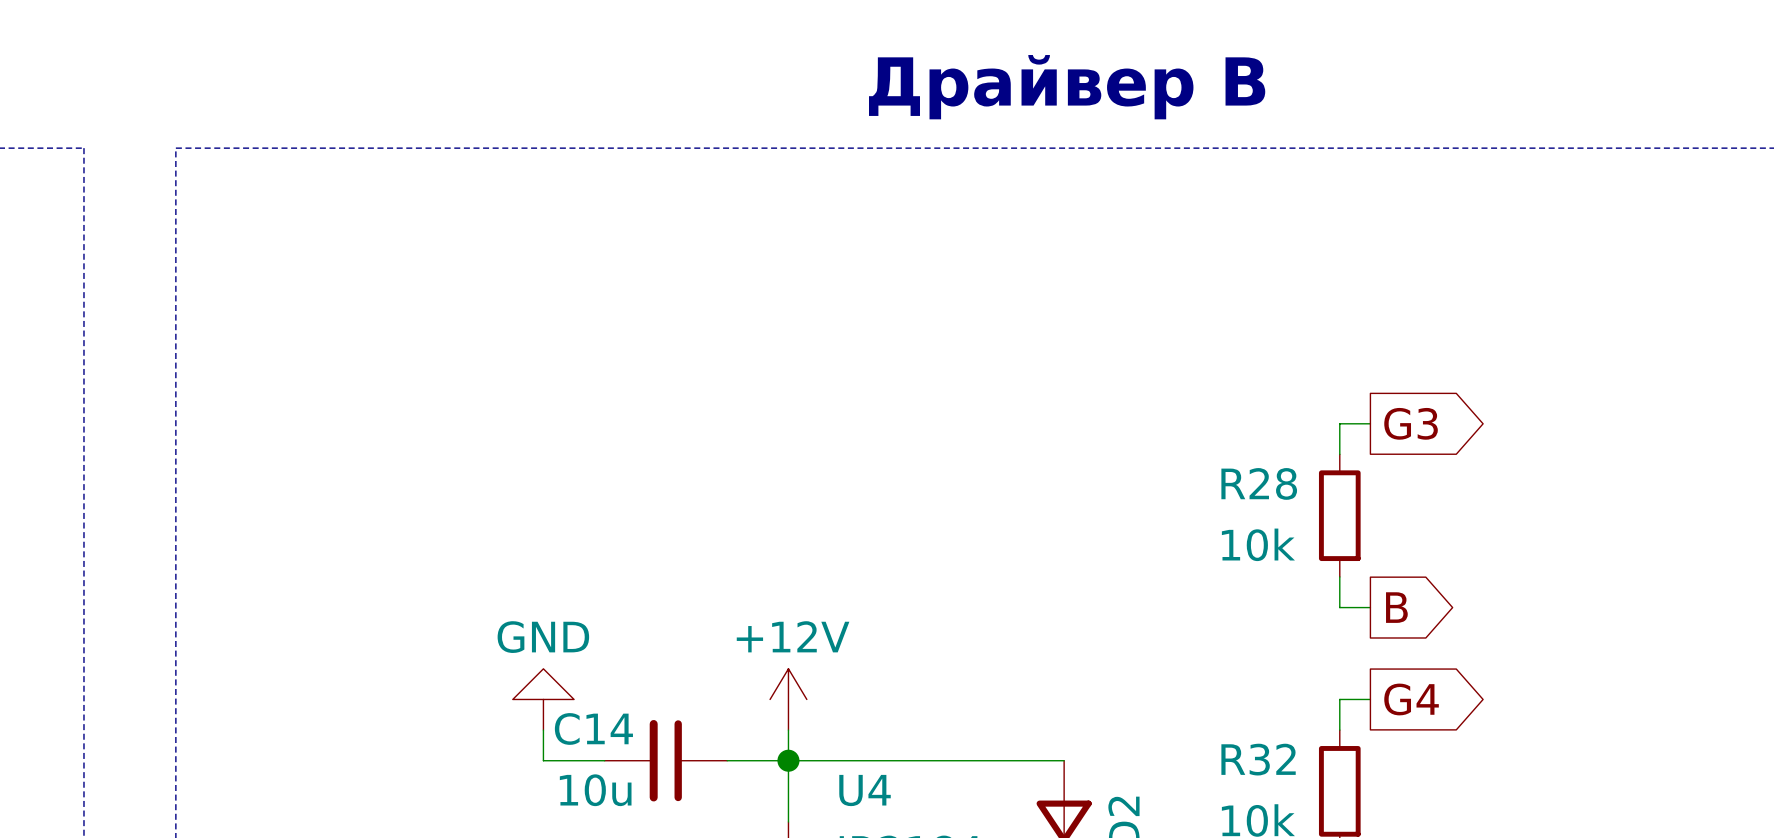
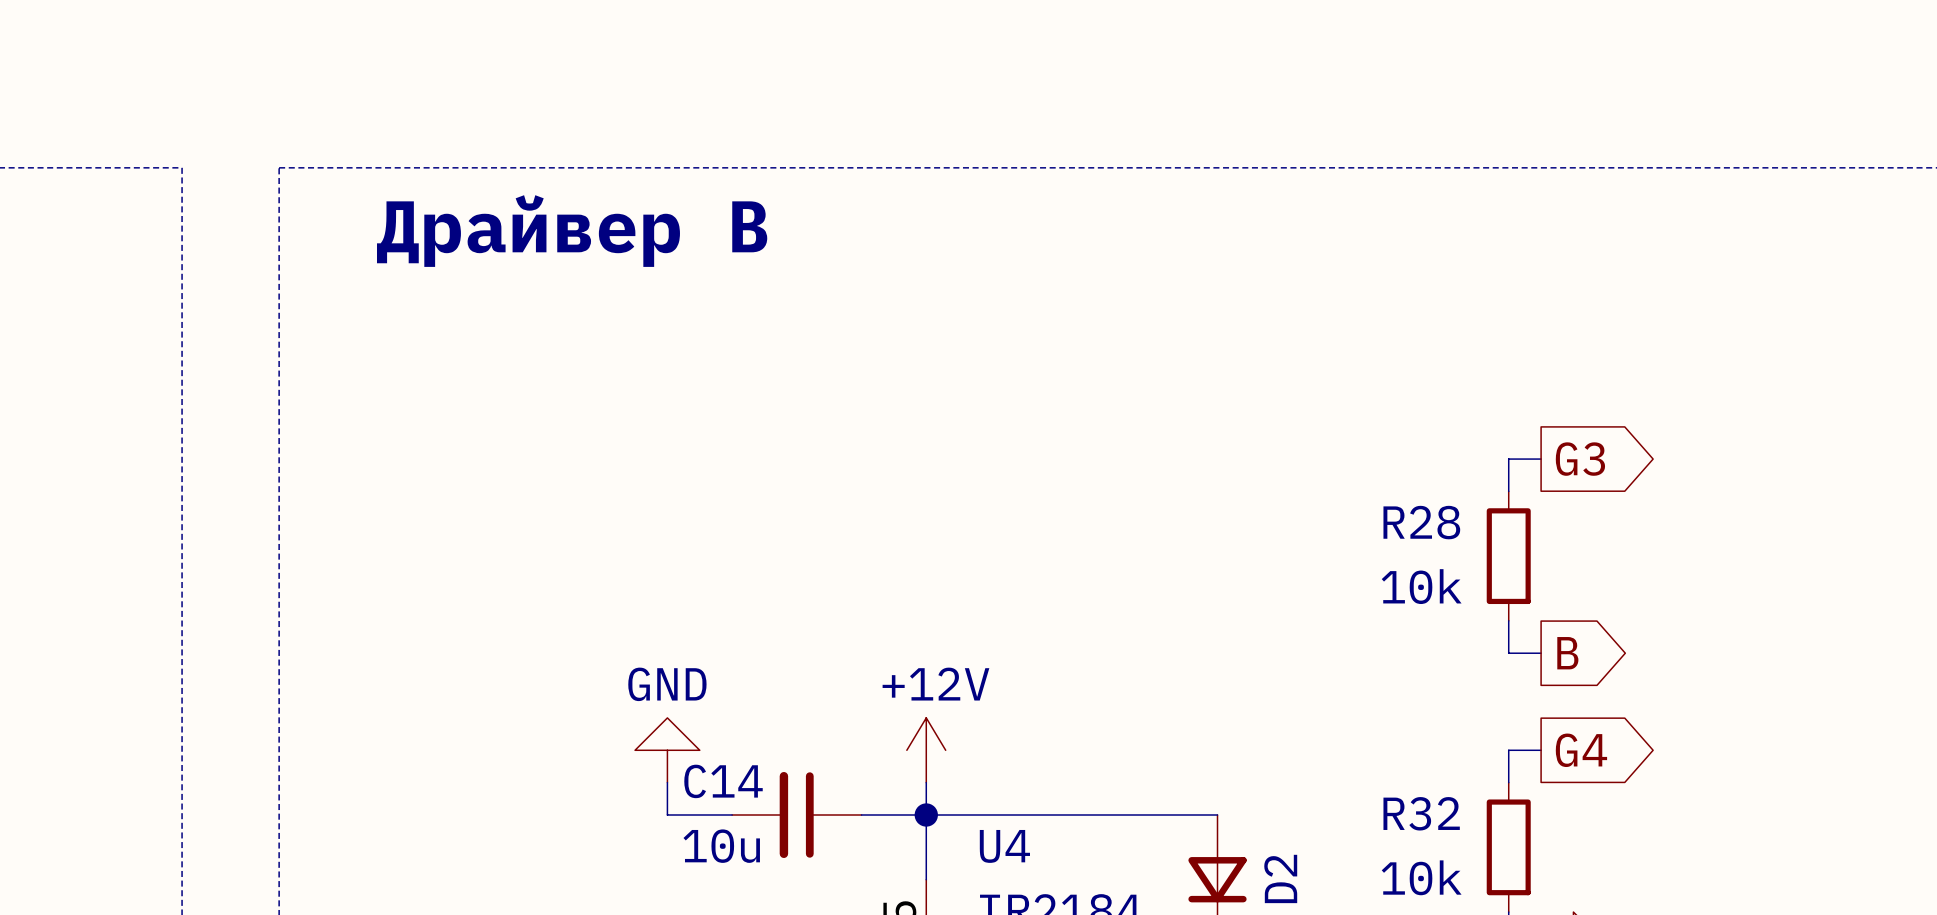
text: Драйвер В (1067, 87) -> none
text: none -> Драйвер В (572, 231)

